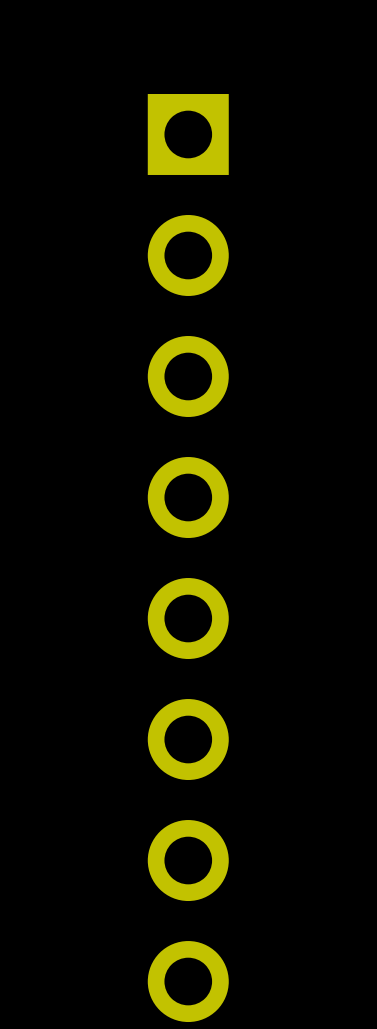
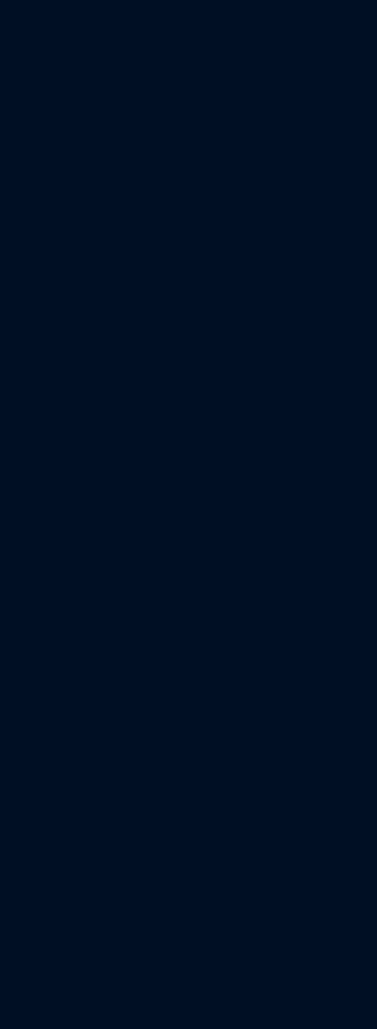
part: (188, 558) -> none

